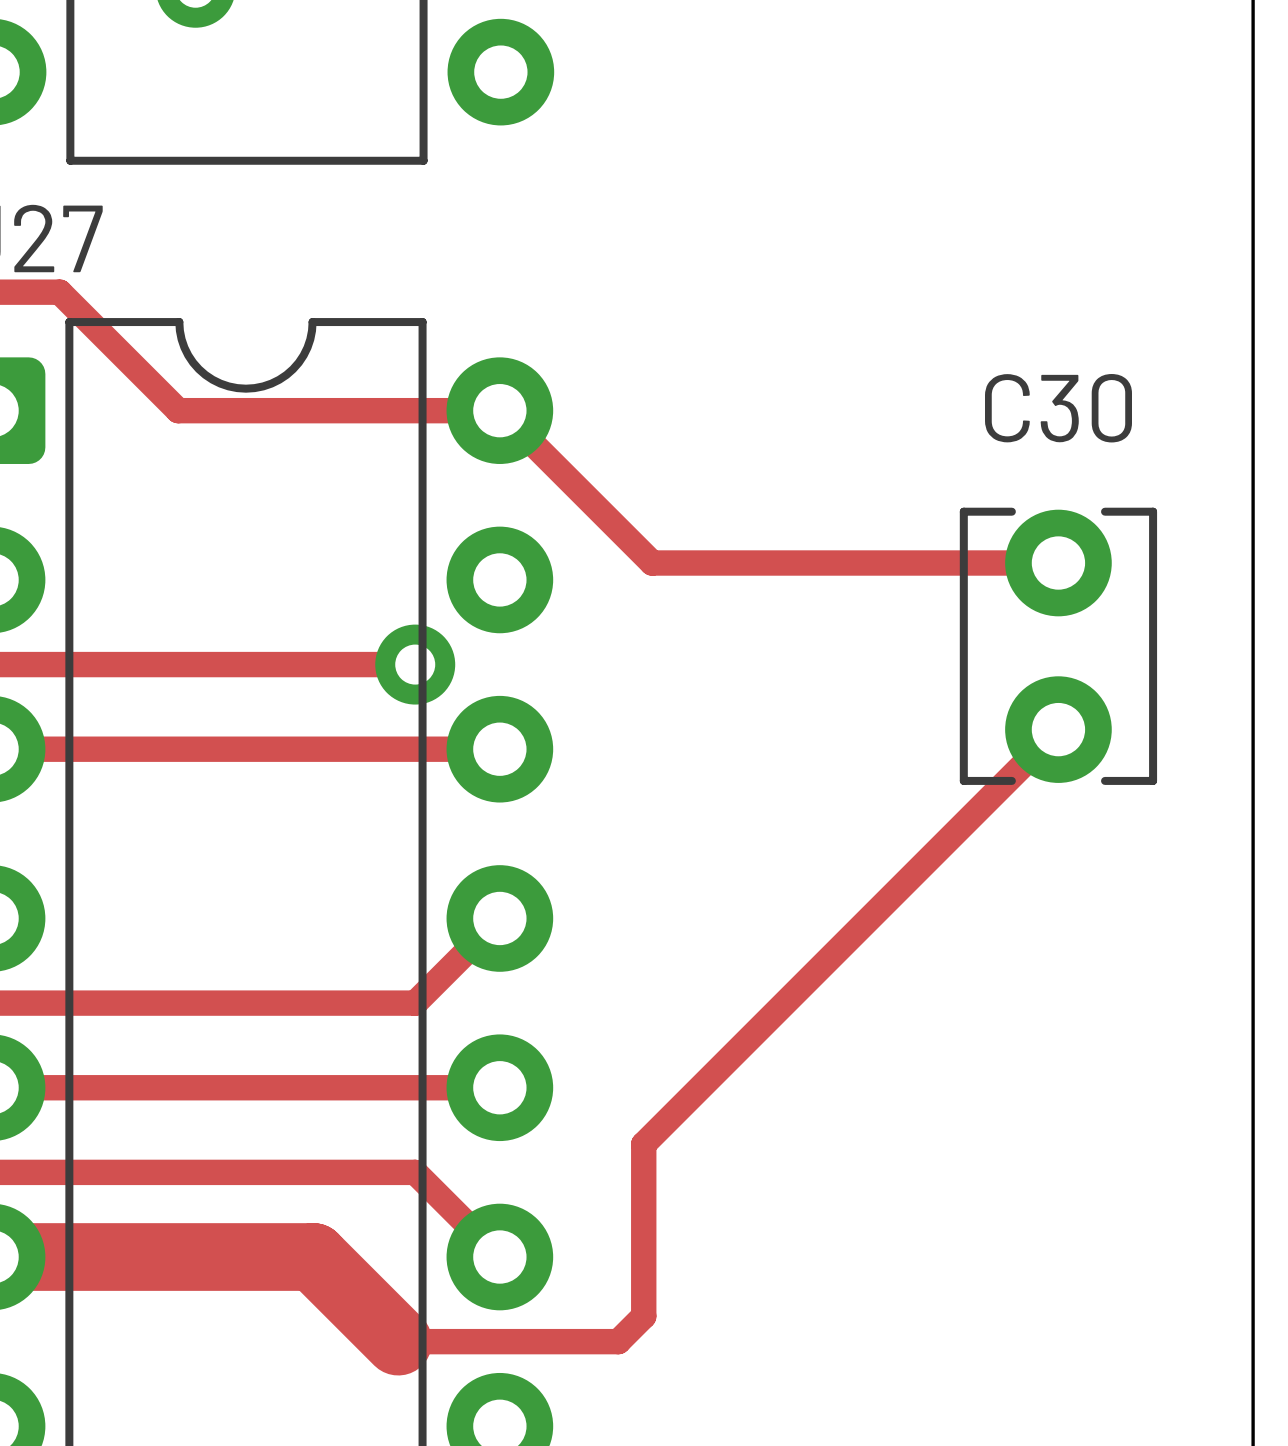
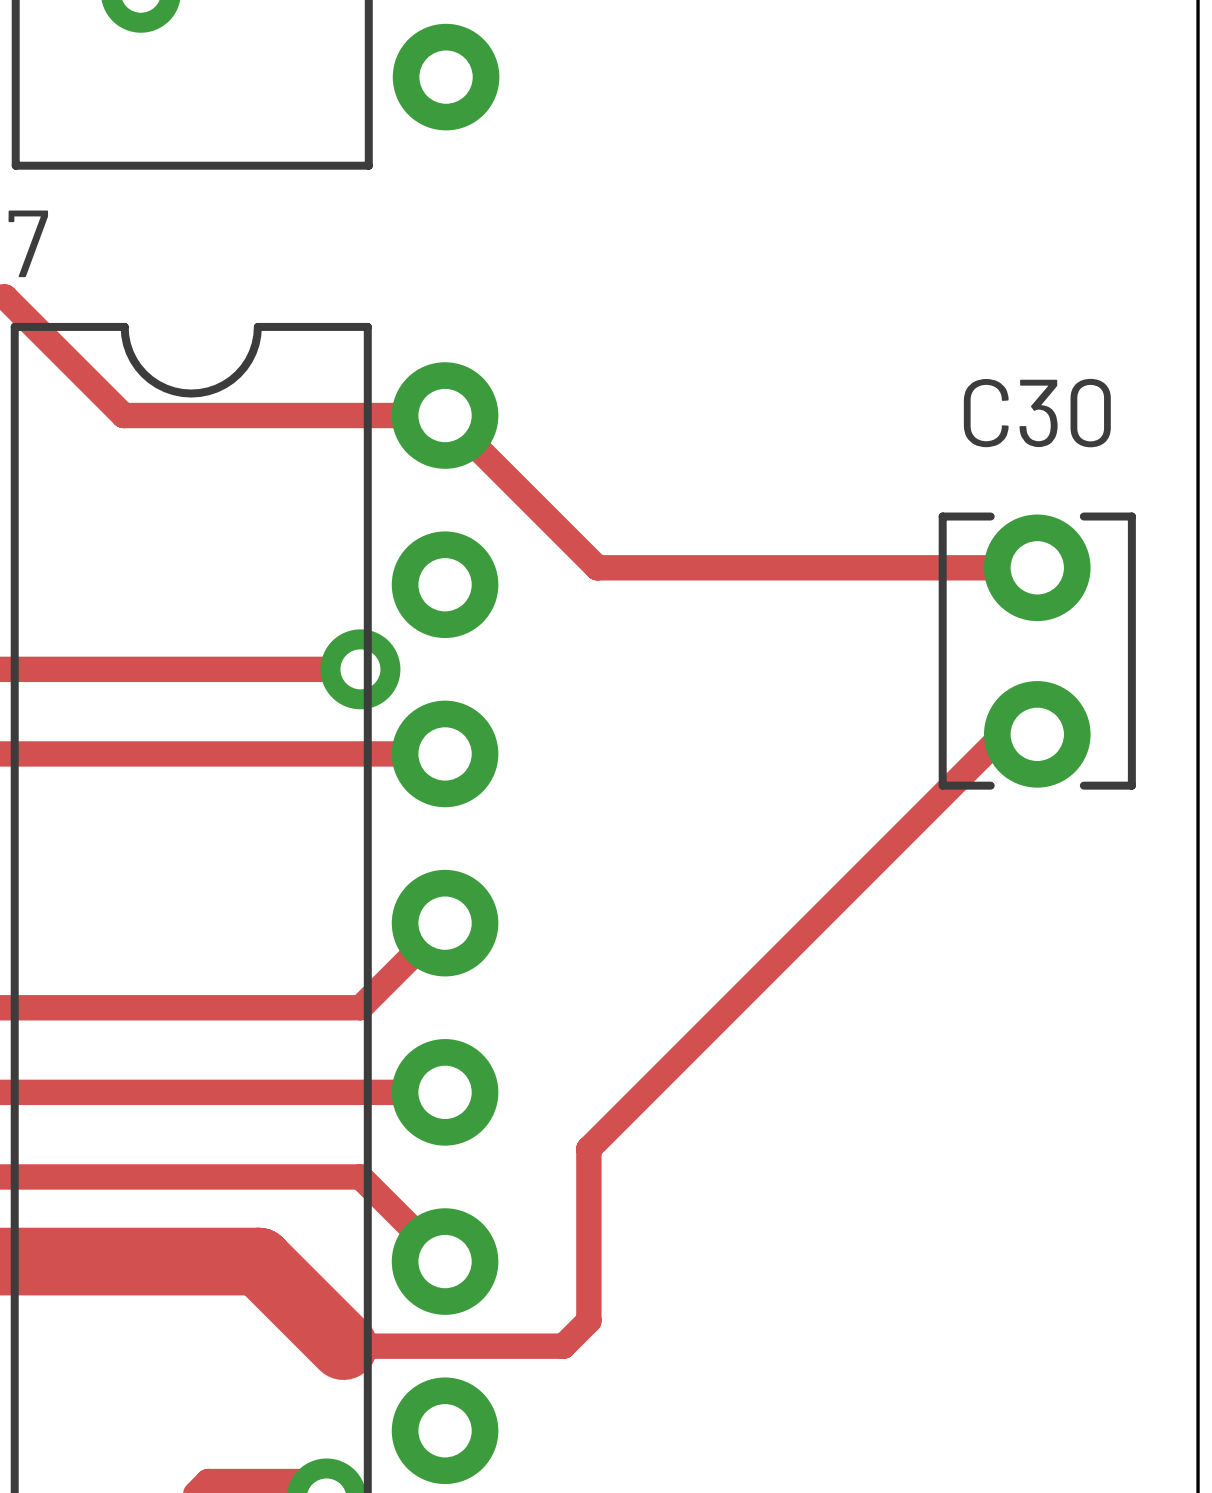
C30 position: (1058, 646) -> (1037, 651)

